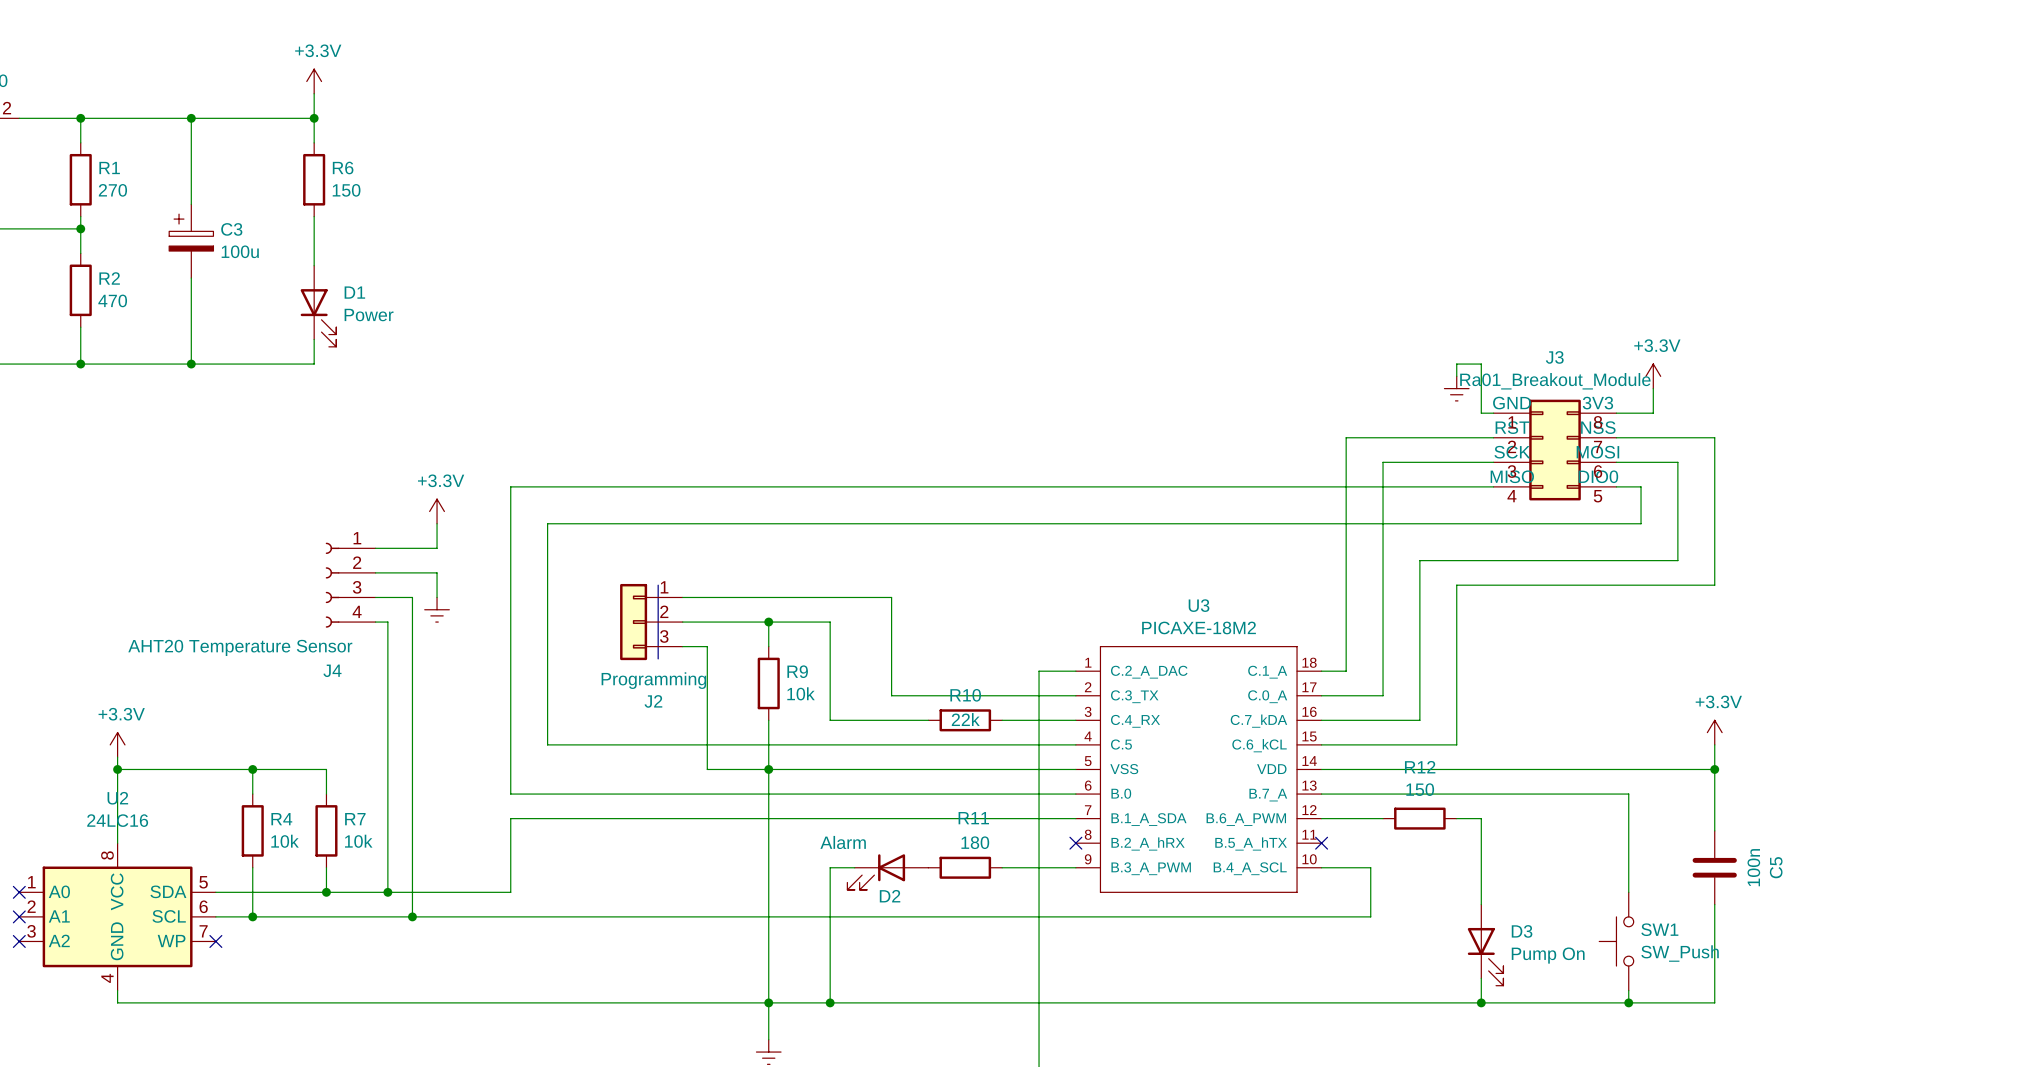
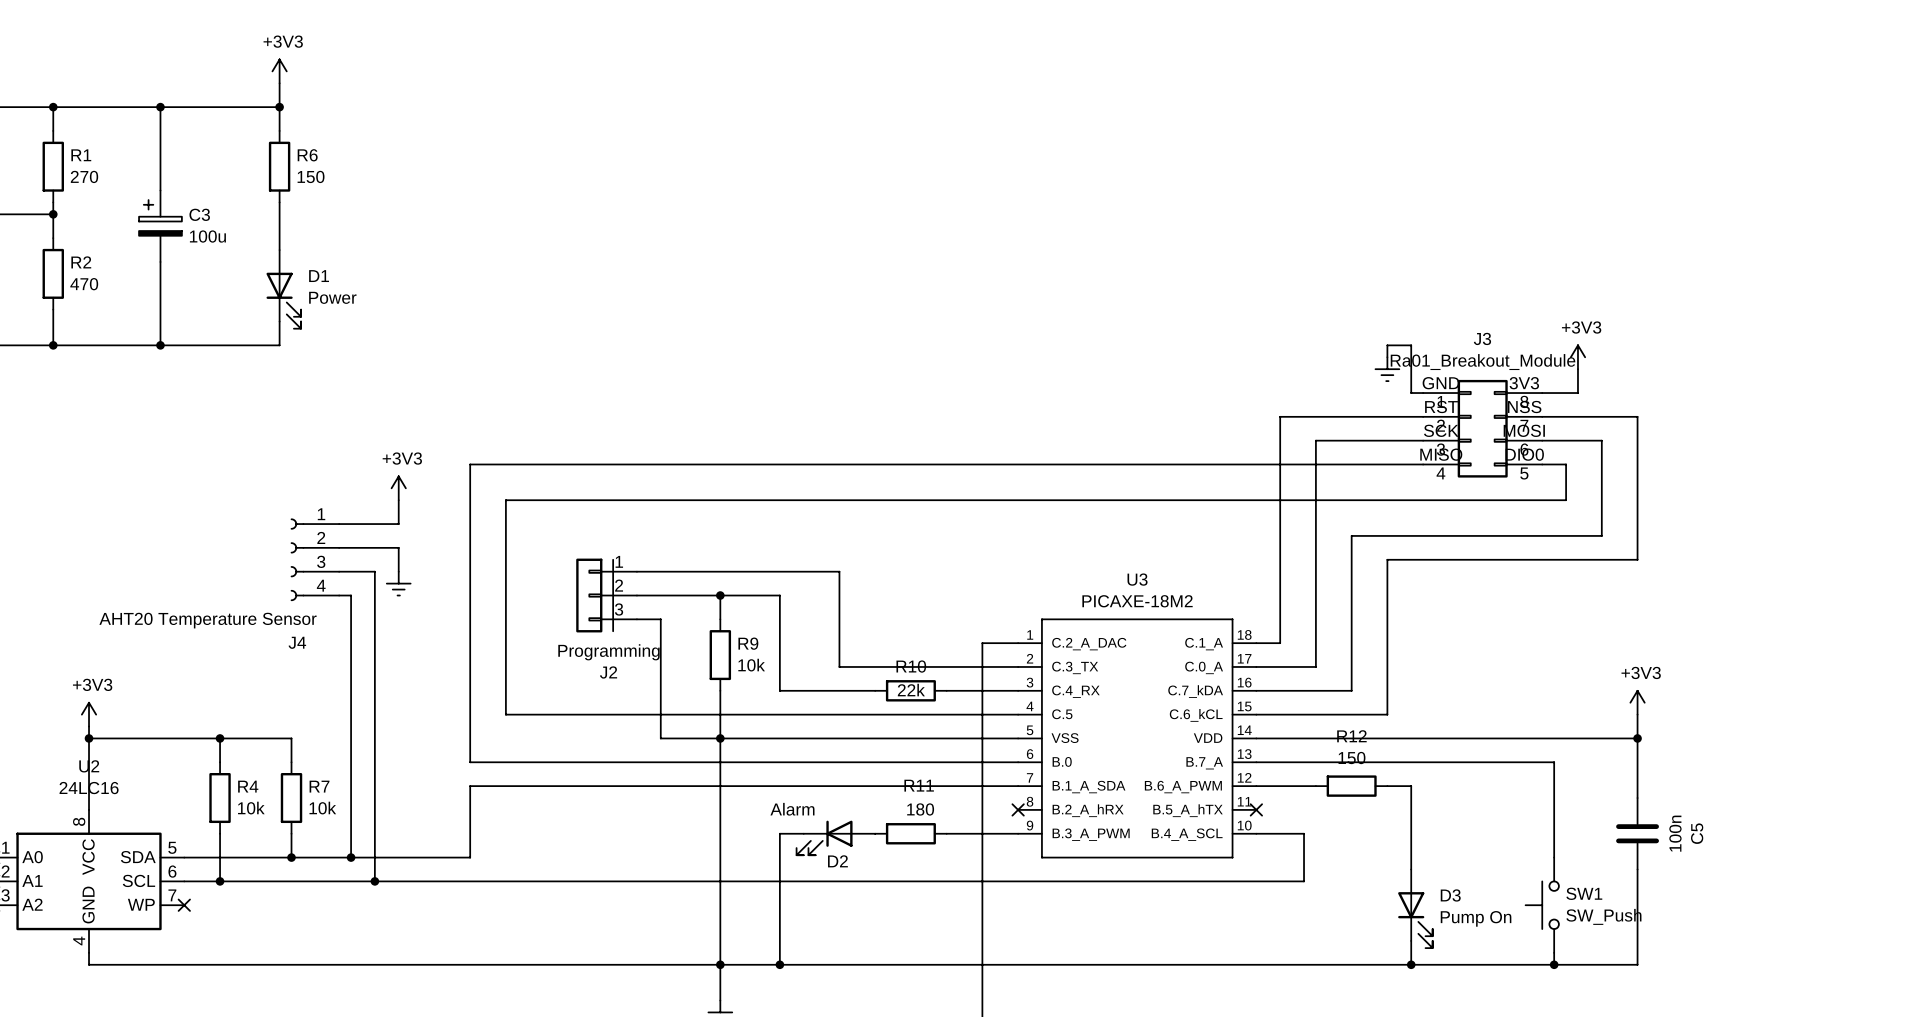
power symbol: +3.3V (314, 81) -> +3V3 (279, 71)
power symbol: +3.3V (1653, 376) -> +3V3 (1577, 357)
power symbol: +3.3V (437, 511) -> +3V3 (398, 488)
power symbol: +3.3V (1714, 732) -> +3V3 (1637, 702)
power symbol: +3.3V (117, 744) -> +3V3 (89, 714)

